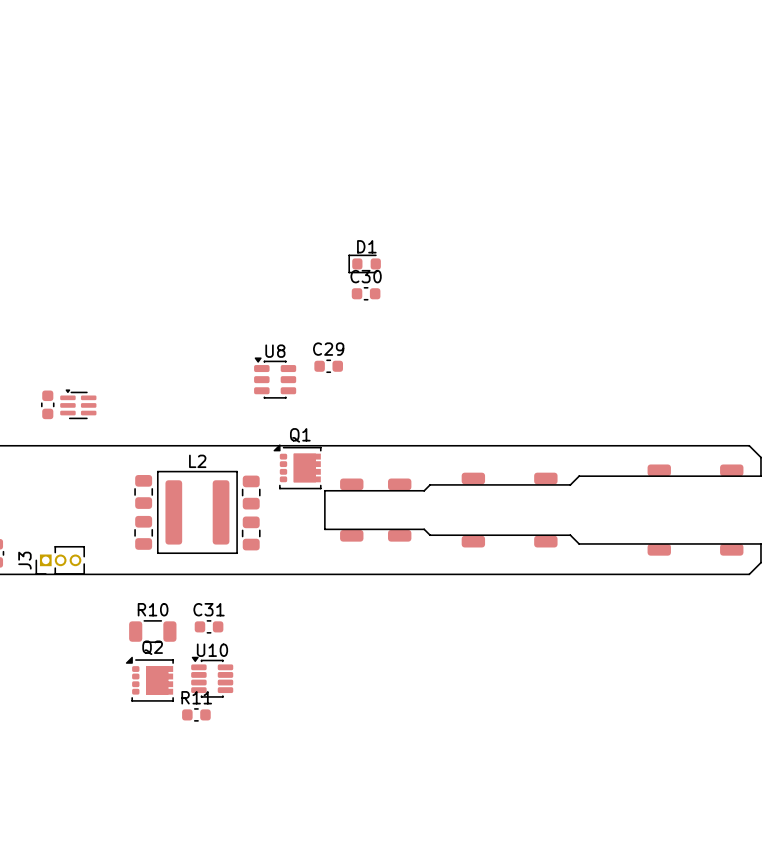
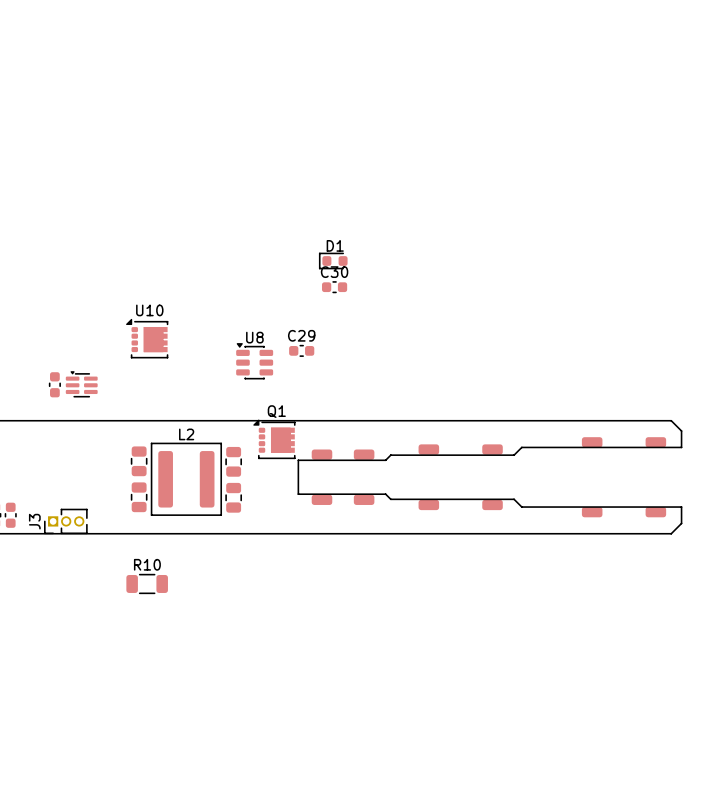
C31: (209, 626) -> none
U10 footprint: [191, 656, 234, 698] -> [126, 318, 169, 359]
Q2: (149, 679) -> none
R11: (196, 714) -> none

